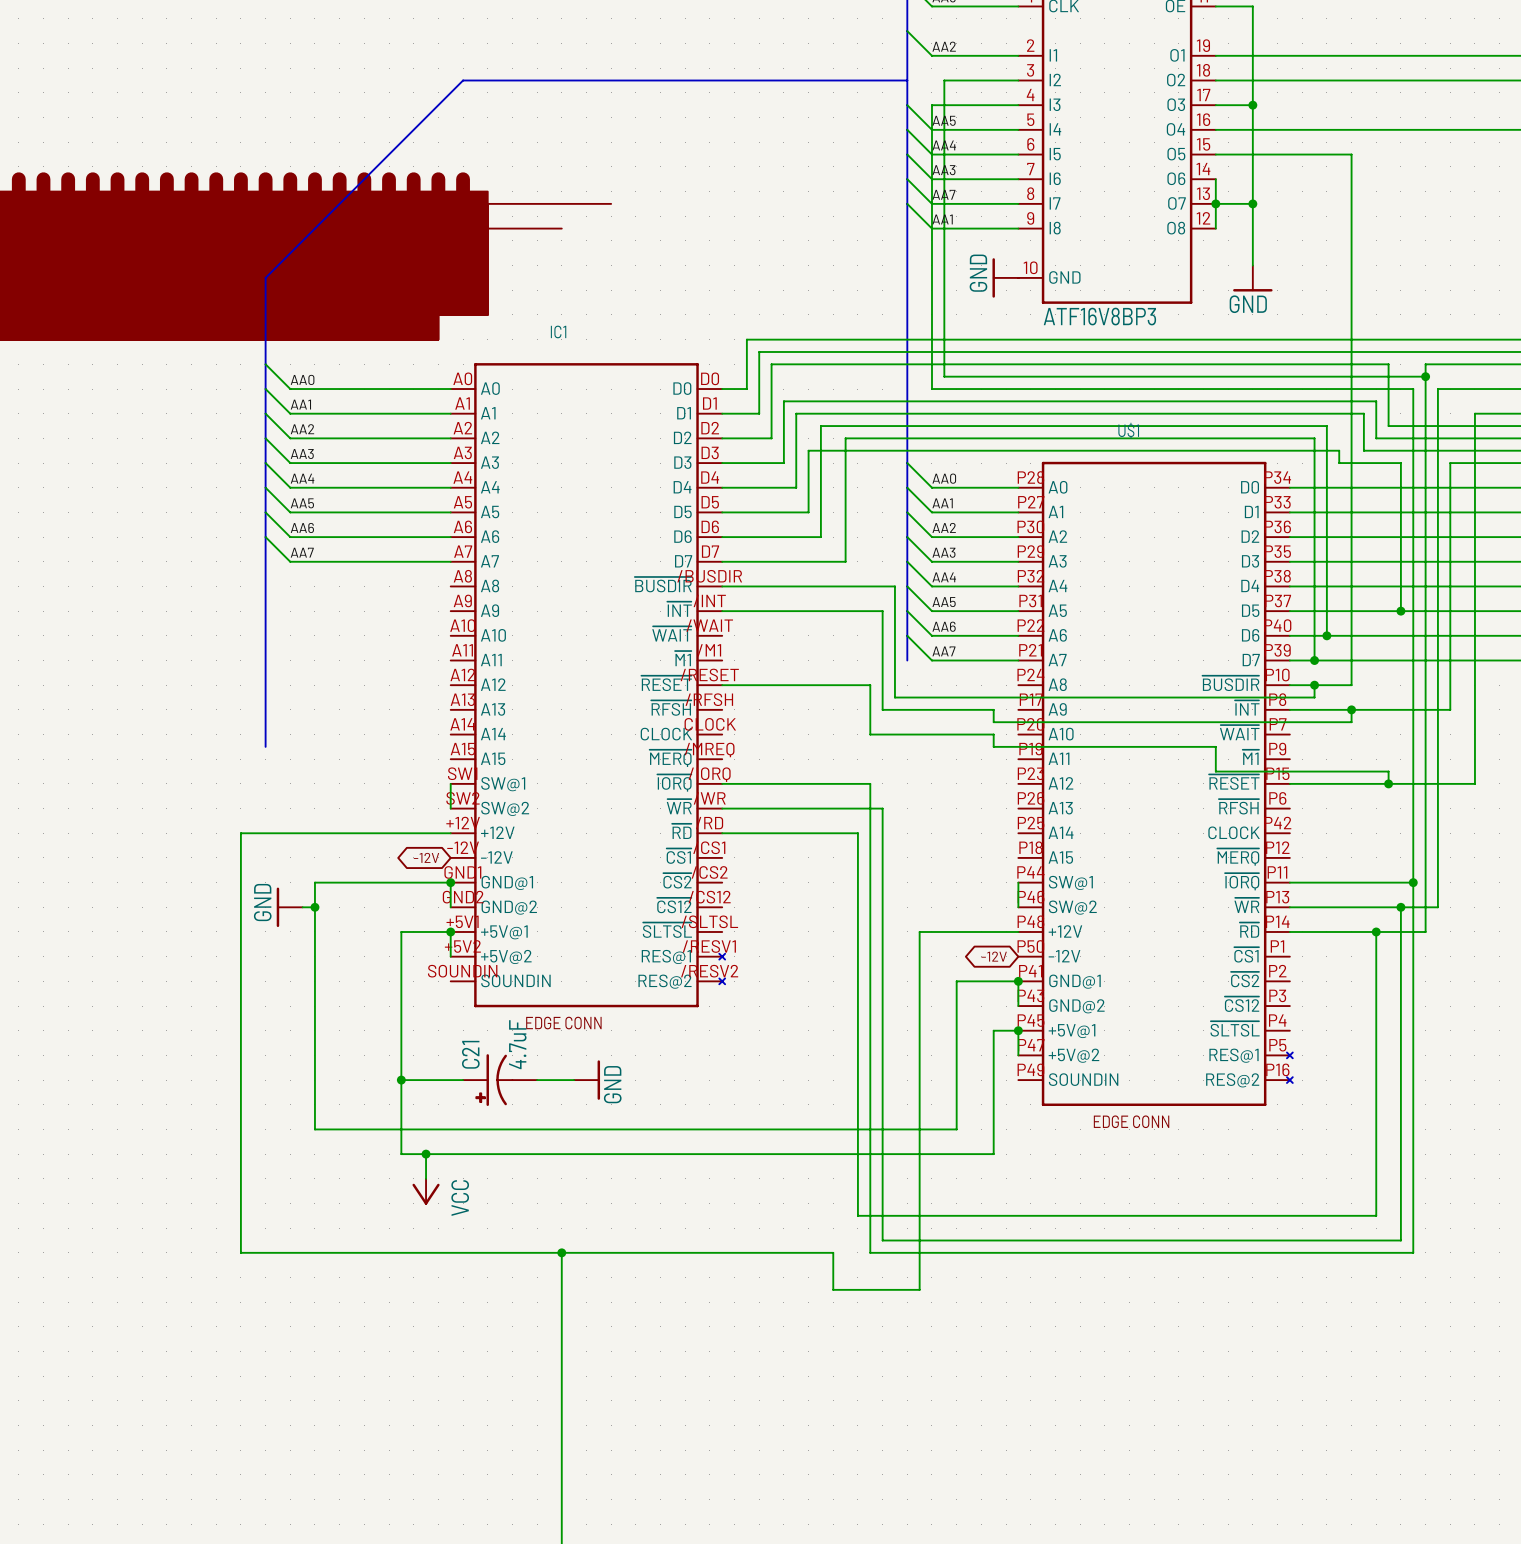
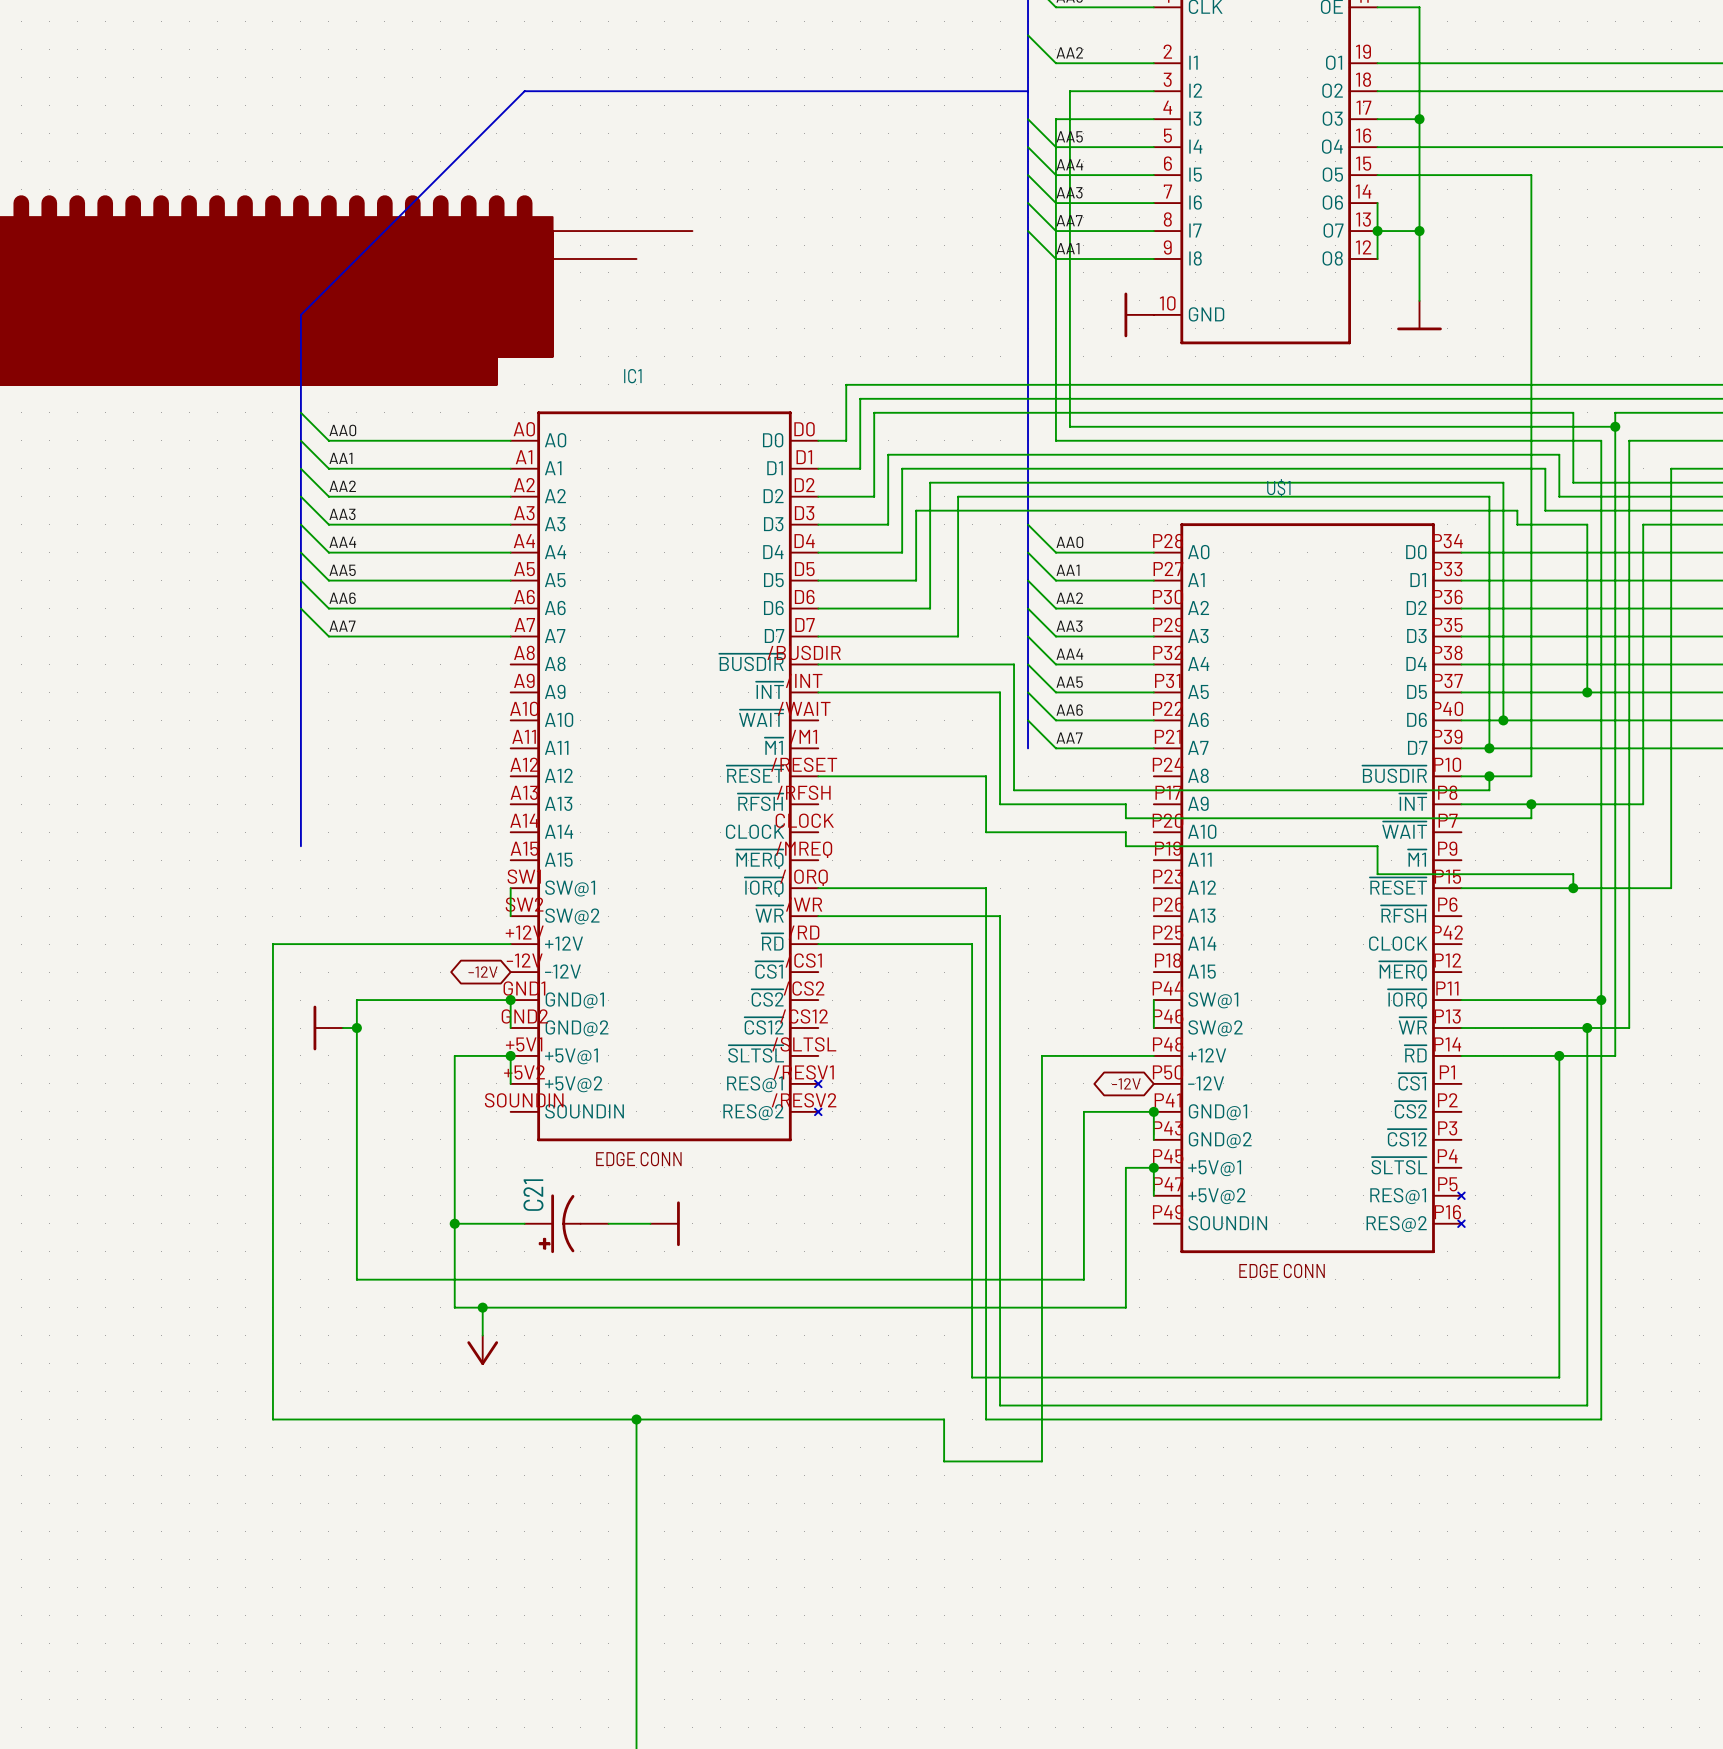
power symbol text: GND (978, 273) -> none
power symbol text: GND (1248, 304) -> none
part value: ATF16V8BP3 (1099, 316) -> none
power symbol text: GND (262, 902) -> none
C21 value: 4.7uF (517, 1044) -> none
power symbol text: GND (612, 1084) -> none
power symbol text: VCC (460, 1198) -> none

